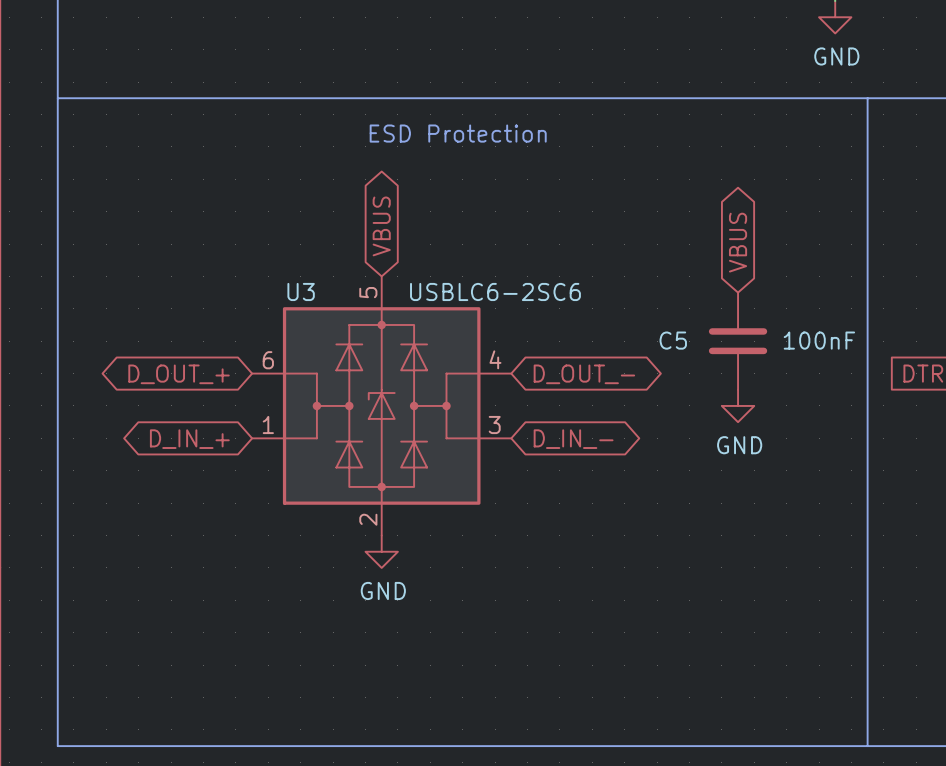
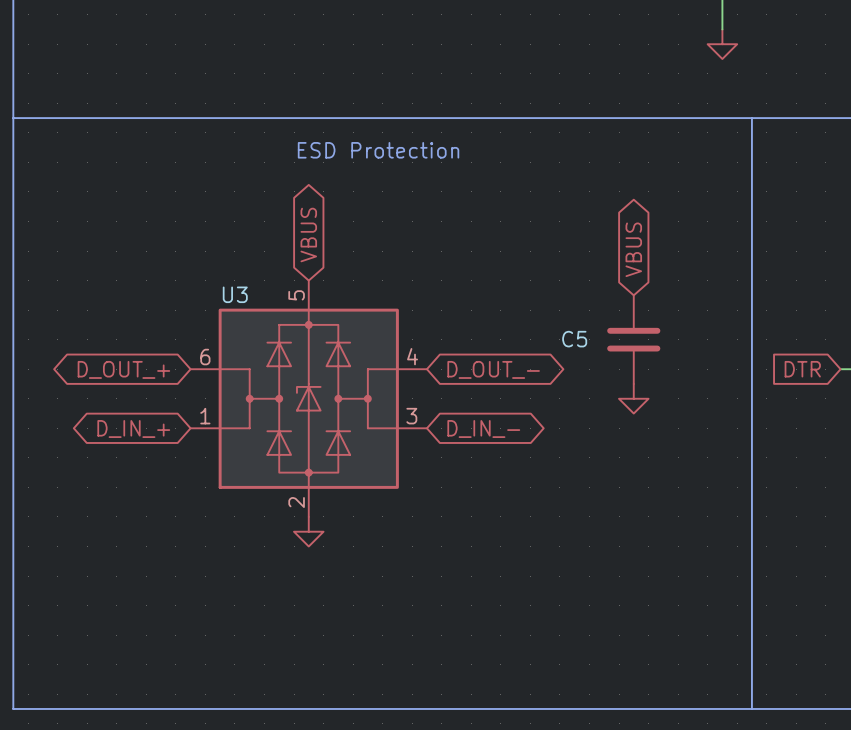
power symbol text: GND (836, 56) -> none
U3 value: USBLC6-2SC6 (495, 291) -> none
C5 value: 100nF (819, 340) -> none
power symbol text: GND (739, 445) -> none
power symbol text: GND (383, 590) -> none

